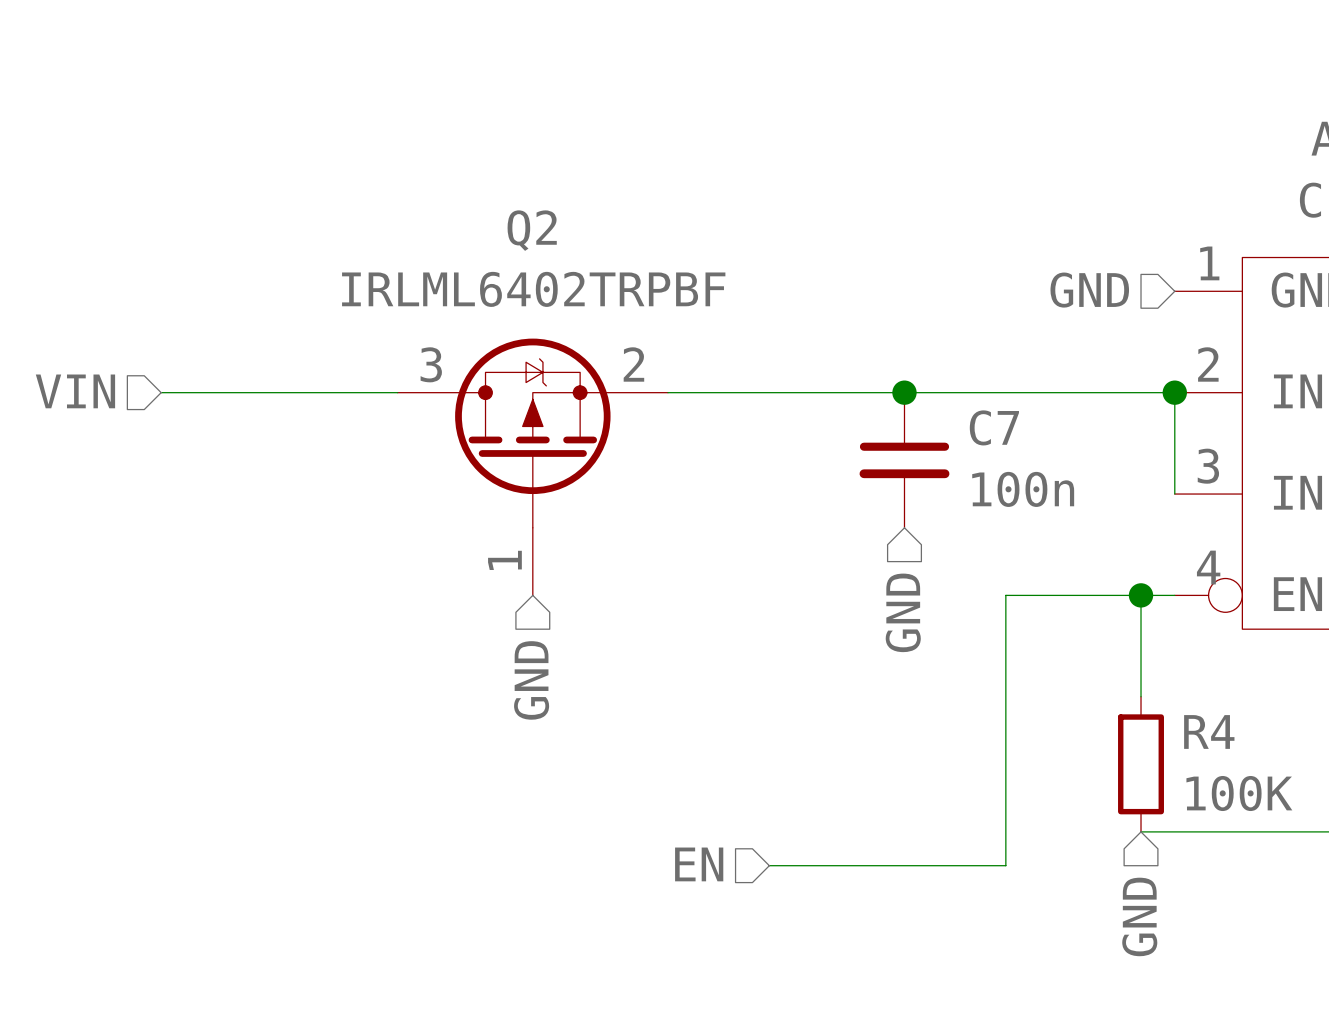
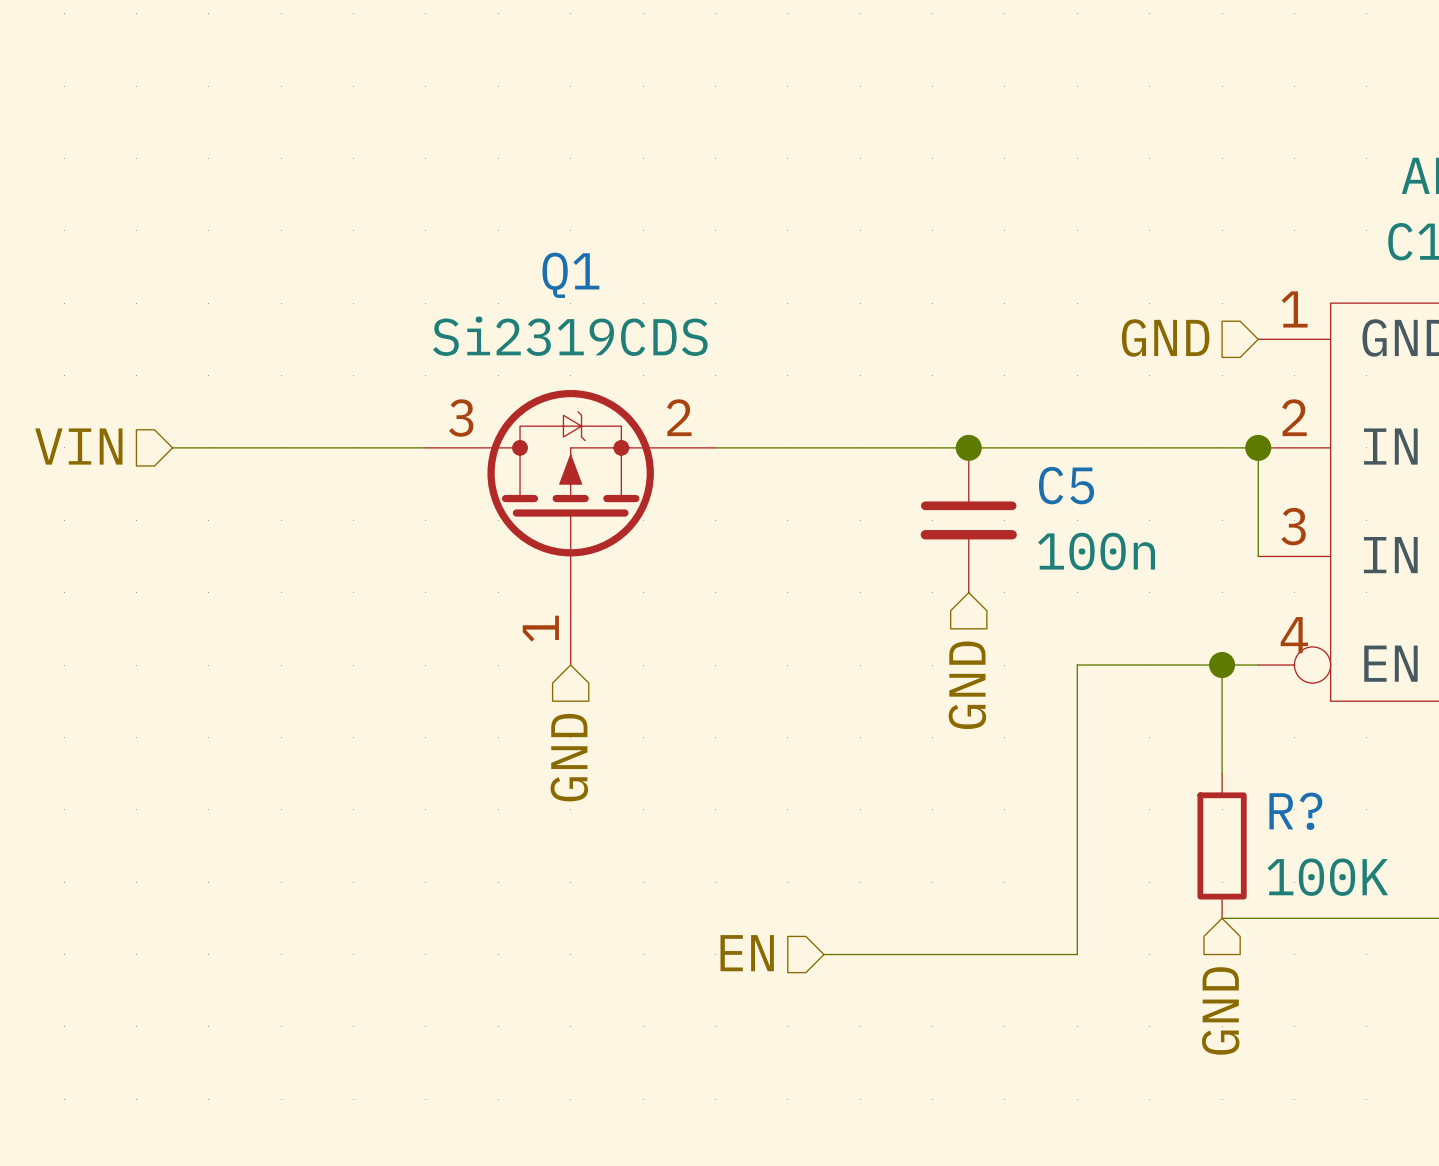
Q2 name: Q2 (532, 230) -> Q1 (570, 275)
Q2 value: IRLML6402TRPBF (533, 289) -> Si2319CDS (570, 336)
C7 name: C7 (994, 427) -> C5 (1066, 485)
R4 name: R4 (1209, 731) -> R? (1295, 811)

